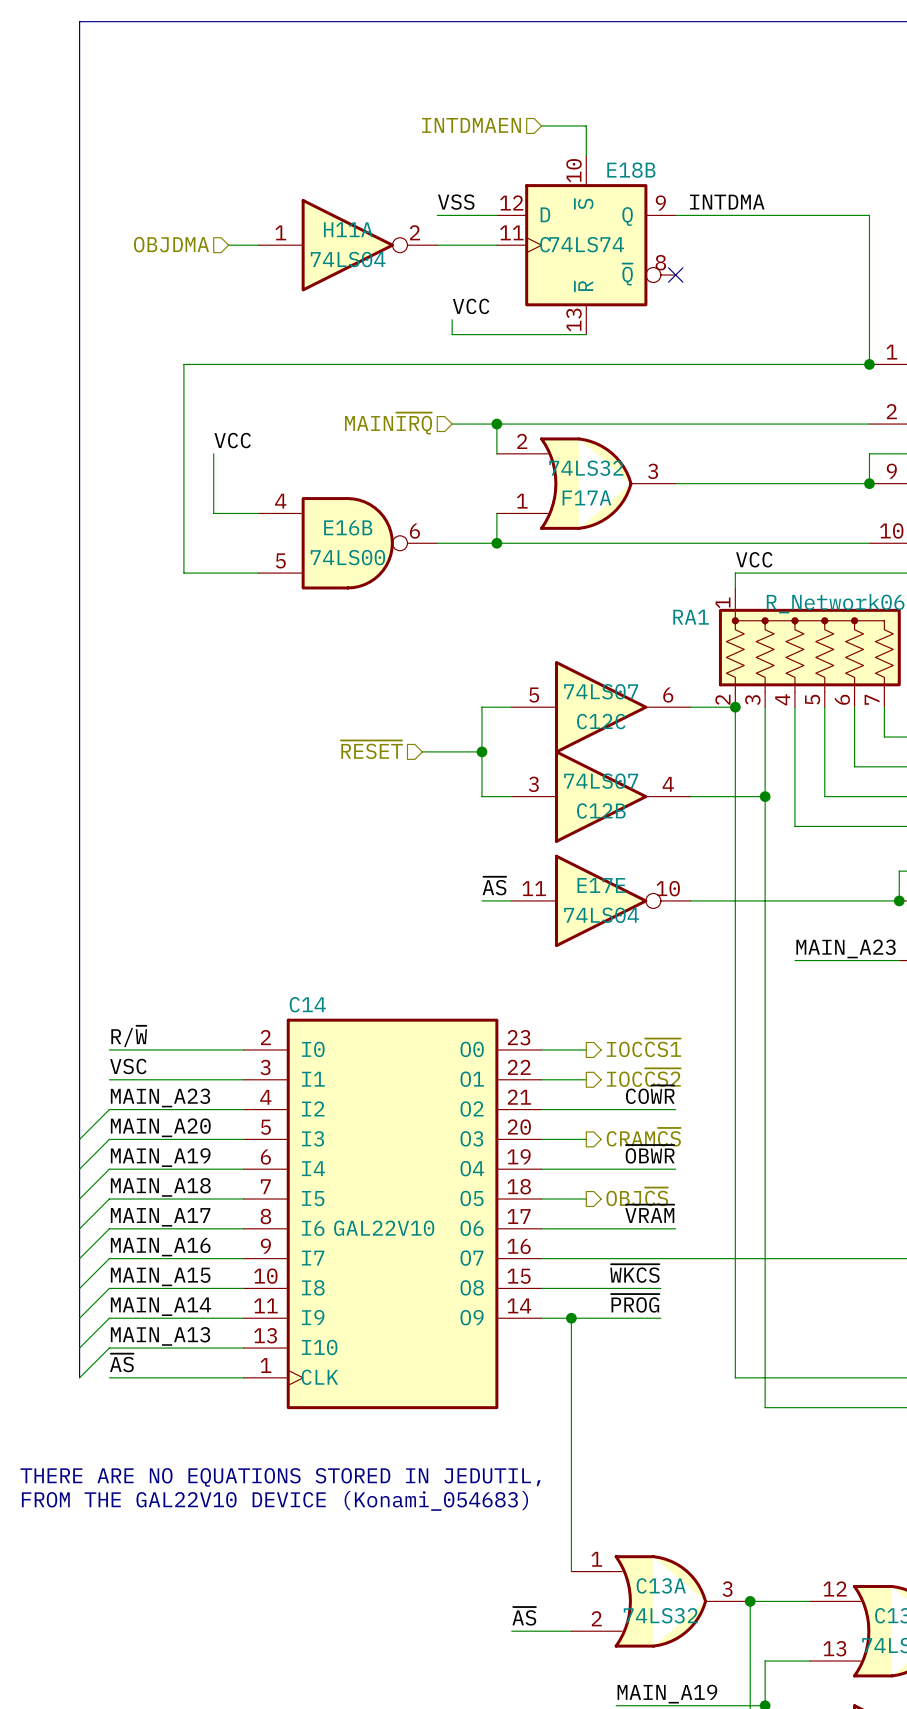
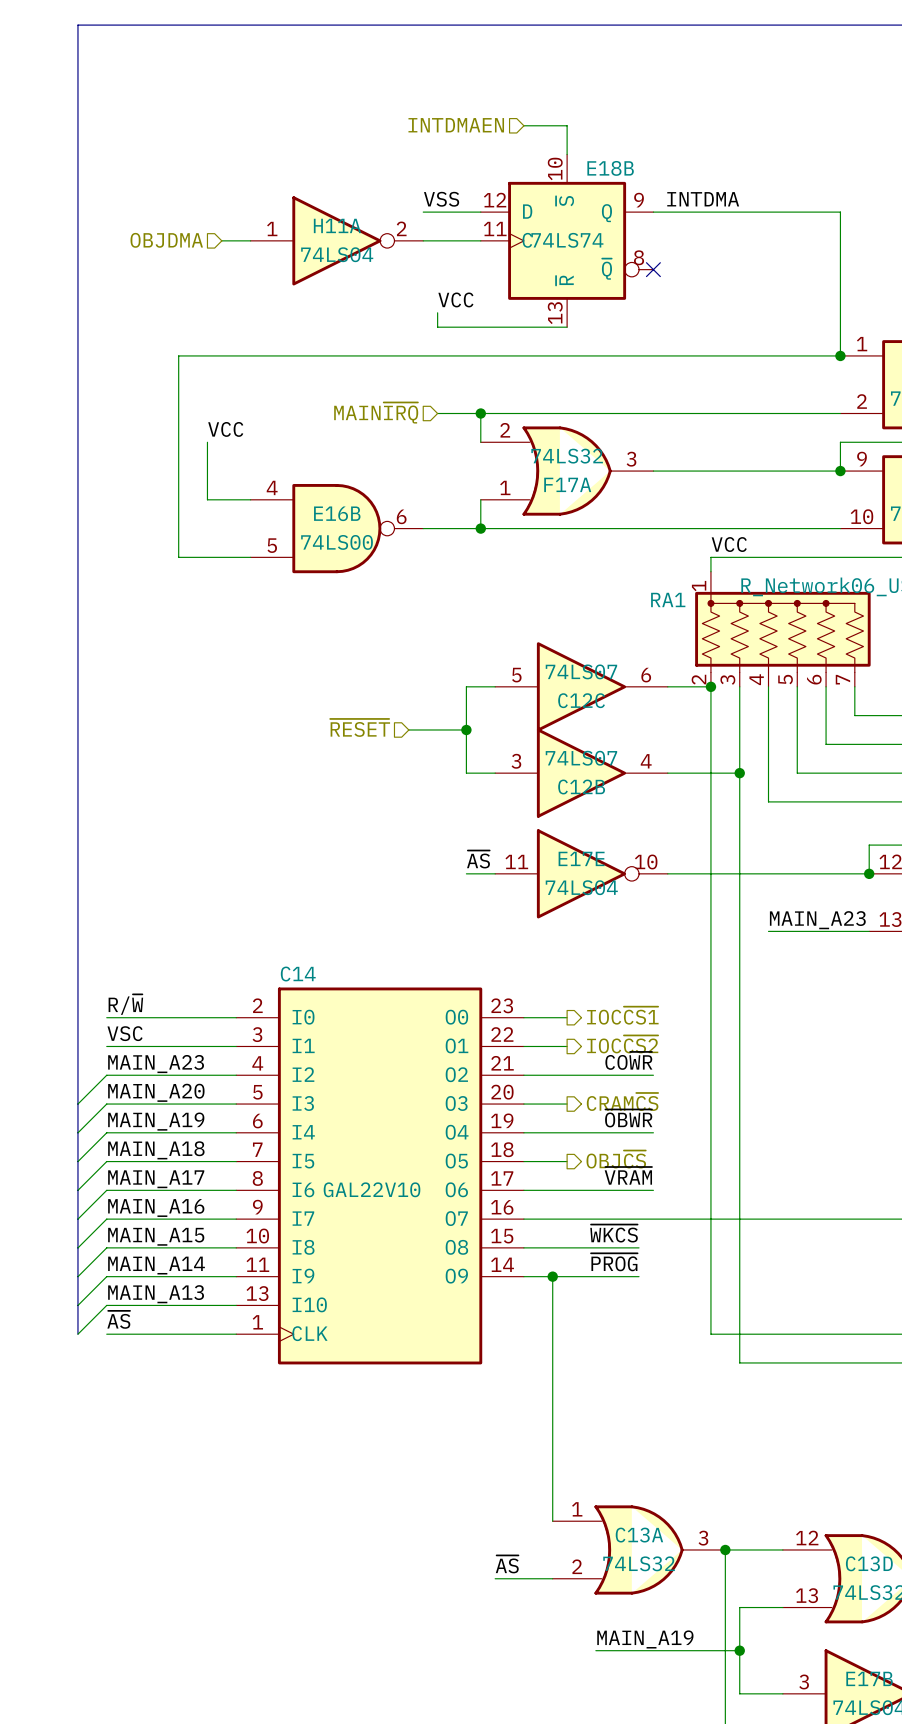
text: THERE ARE NO EQUATIONS STORED IN JEDUTIL, (280, 1477) -> none
text: FROM THE GAL22V10 DEVICE (Konami_054683) (274, 1500) -> none

